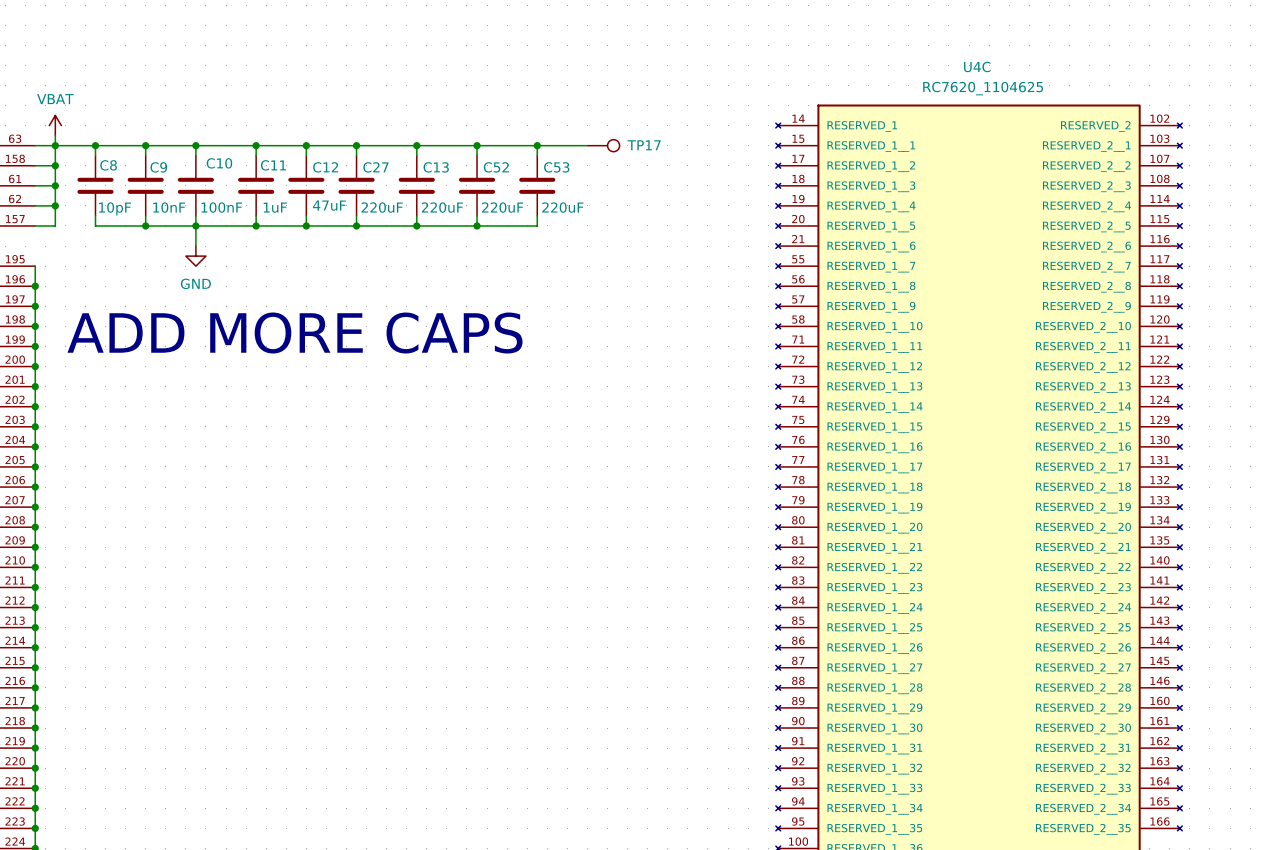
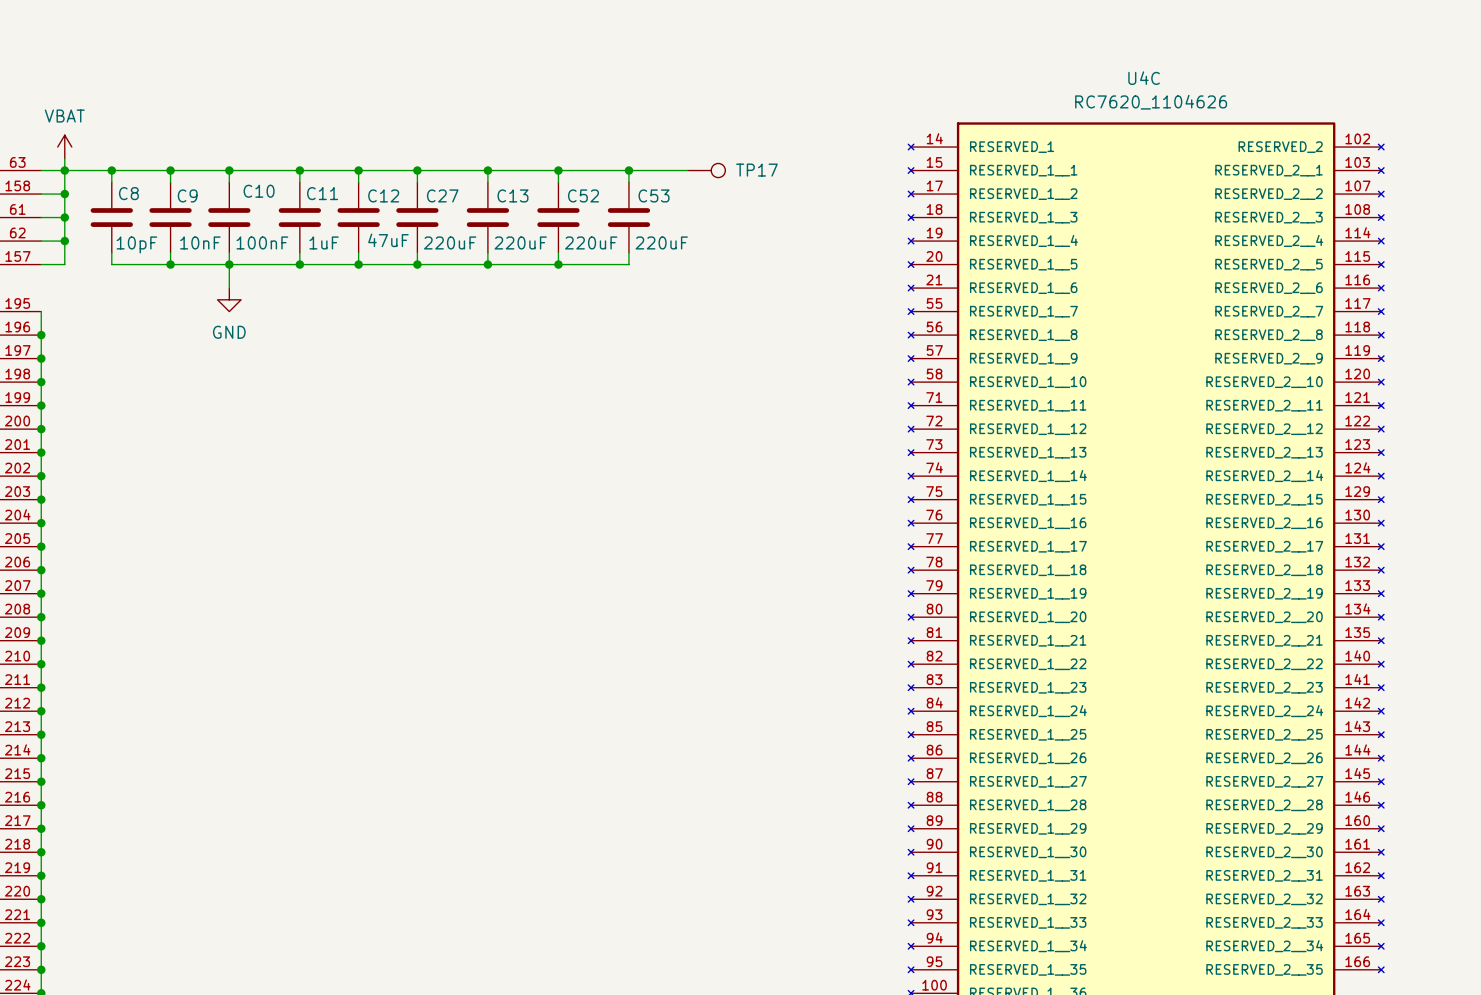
U4C value: RC7620_1104625 (983, 88) -> RC7620_1104626 (1151, 102)
text: ADD MORE CAPS (295, 333) -> none

